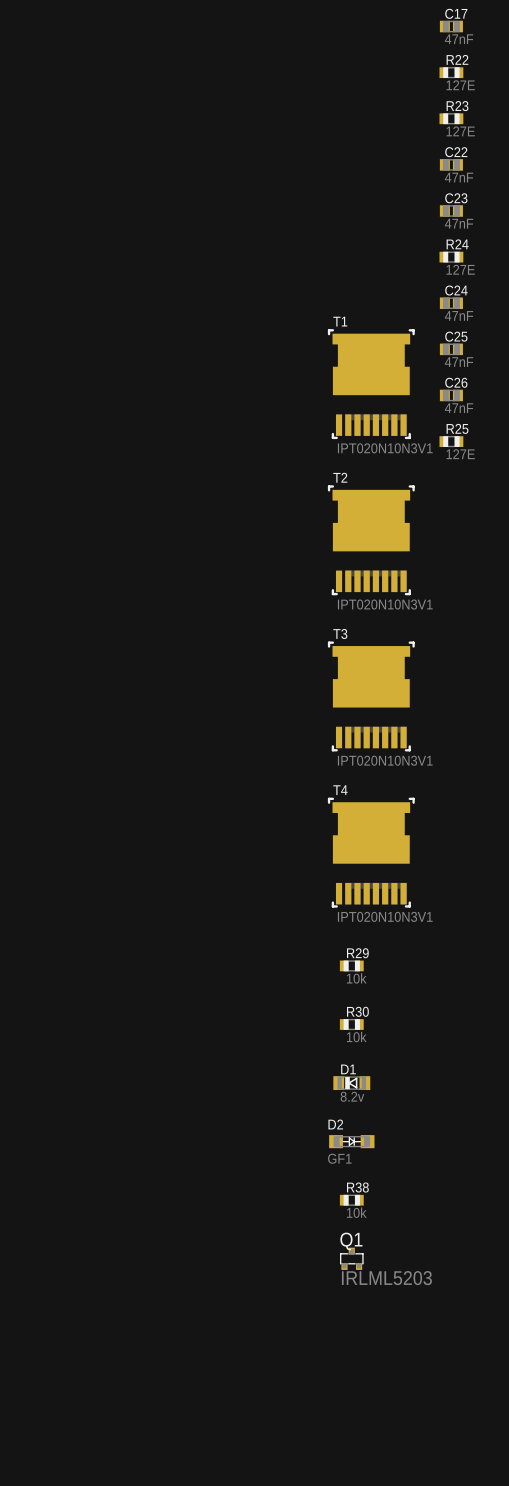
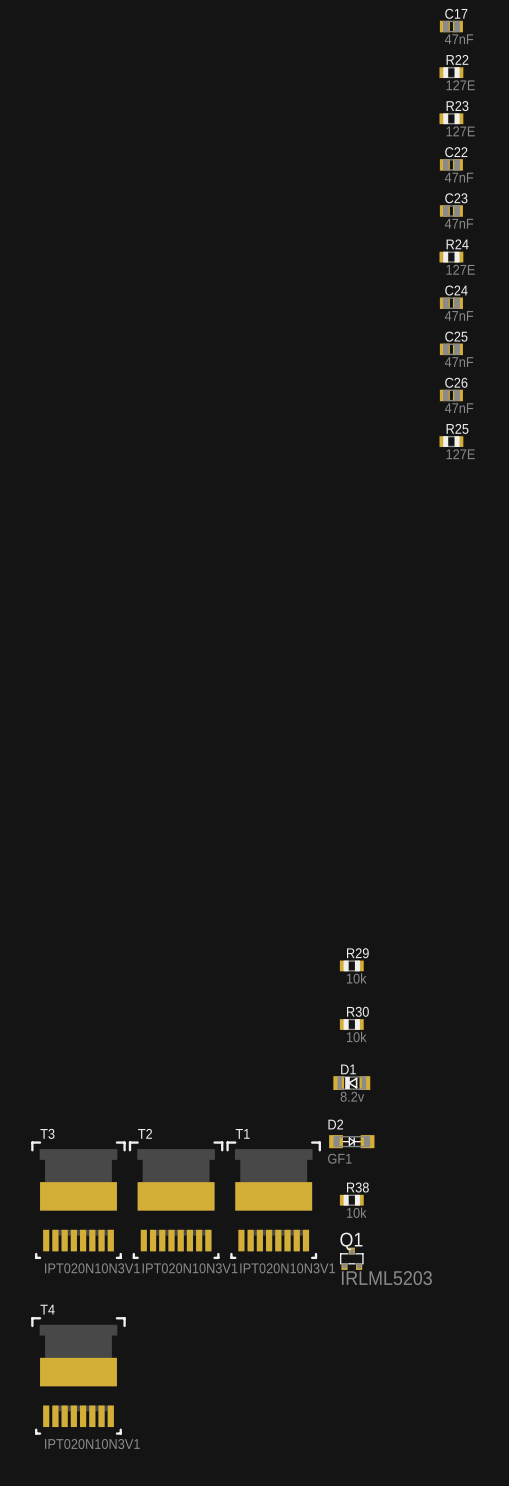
T1 footprint: [322, 329, 415, 445] -> [226, 1141, 322, 1260]
T2 footprint: [322, 485, 415, 602] -> [128, 1141, 224, 1260]
T3 footprint: [322, 641, 415, 758] -> [31, 1141, 126, 1260]
T4 footprint: [322, 797, 415, 914] -> [31, 1317, 126, 1435]

